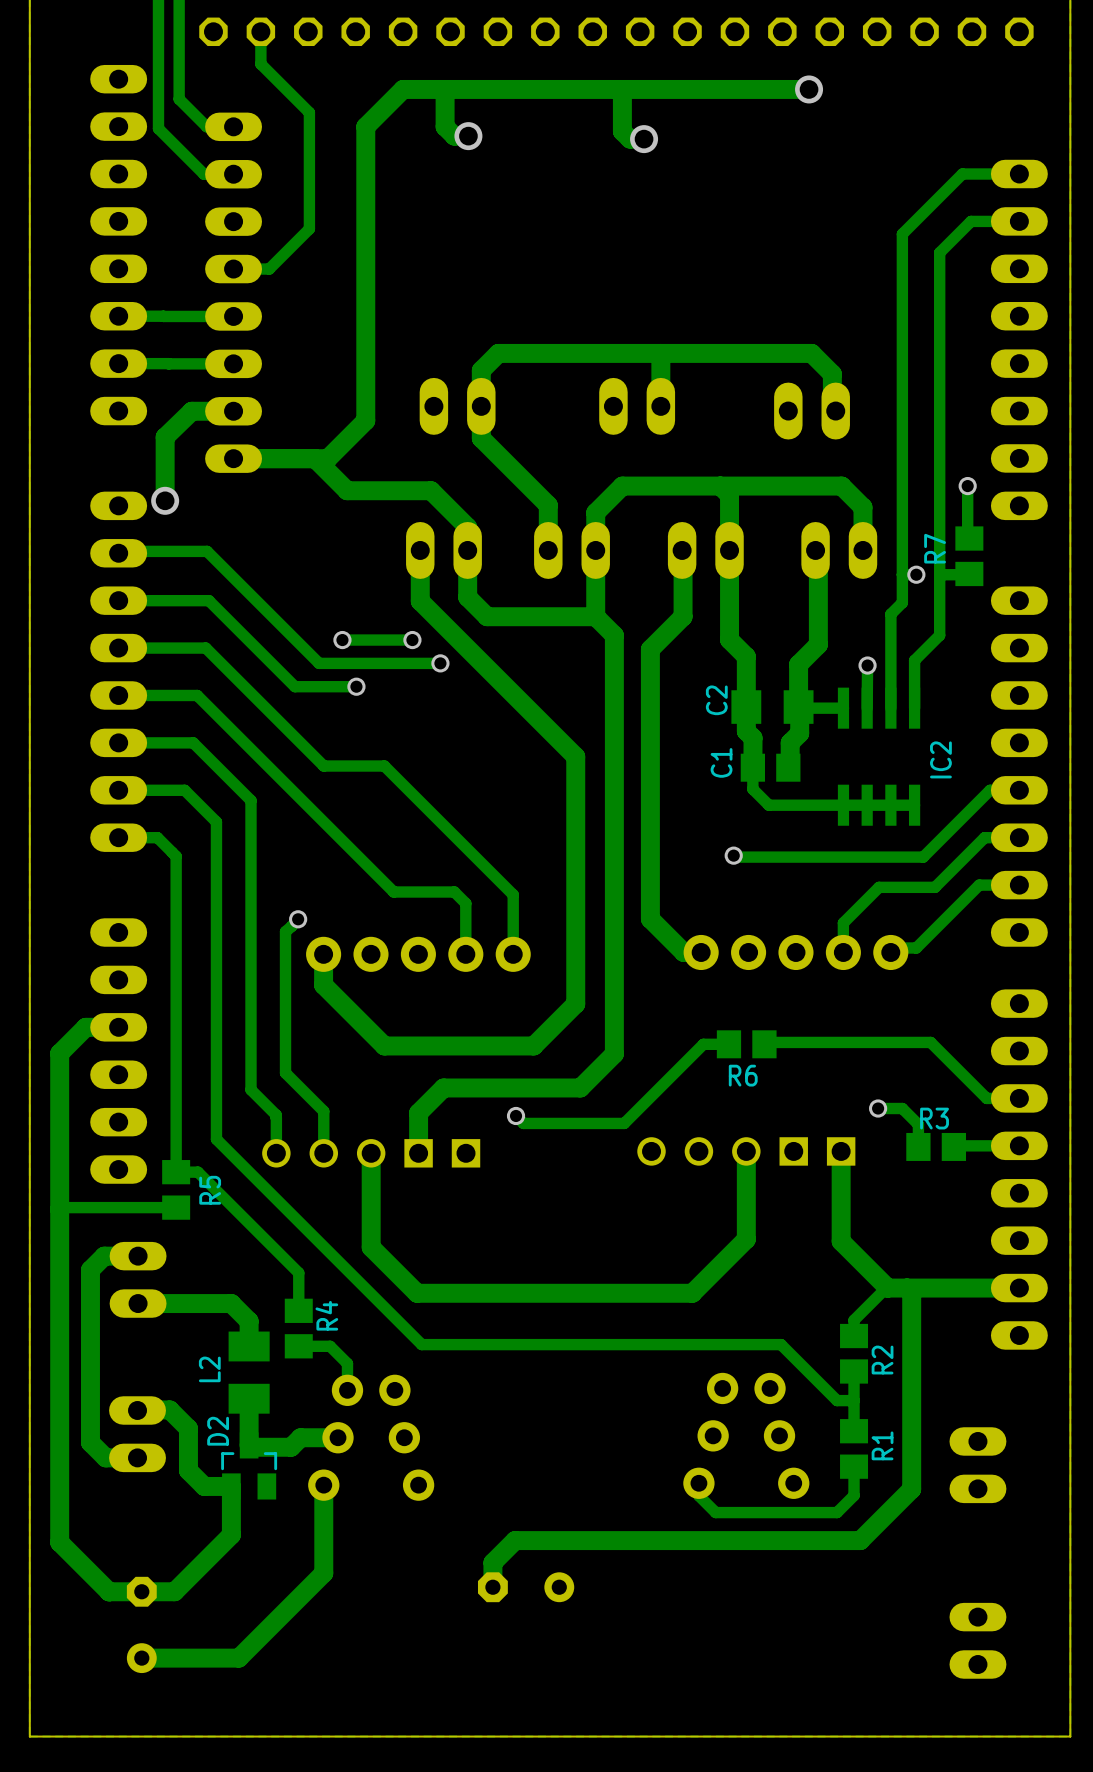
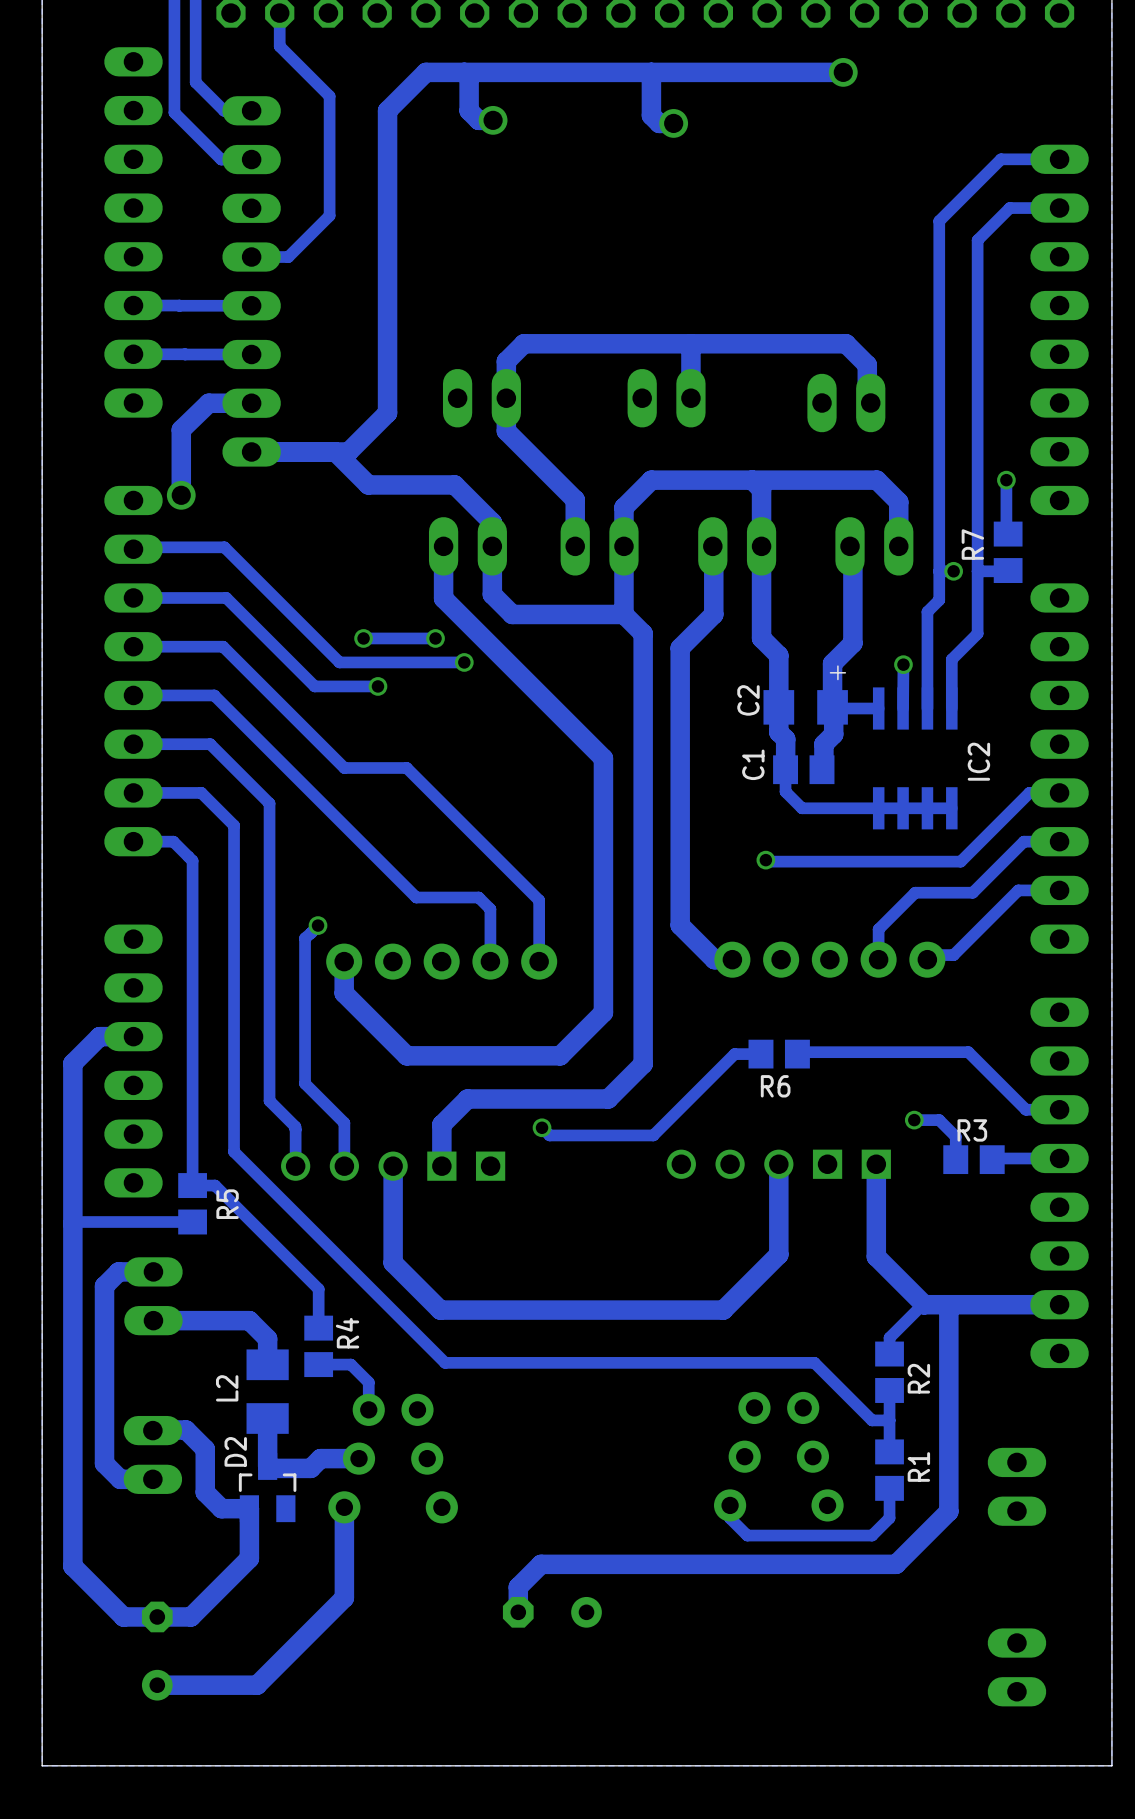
text: none -> + (837, 672)

